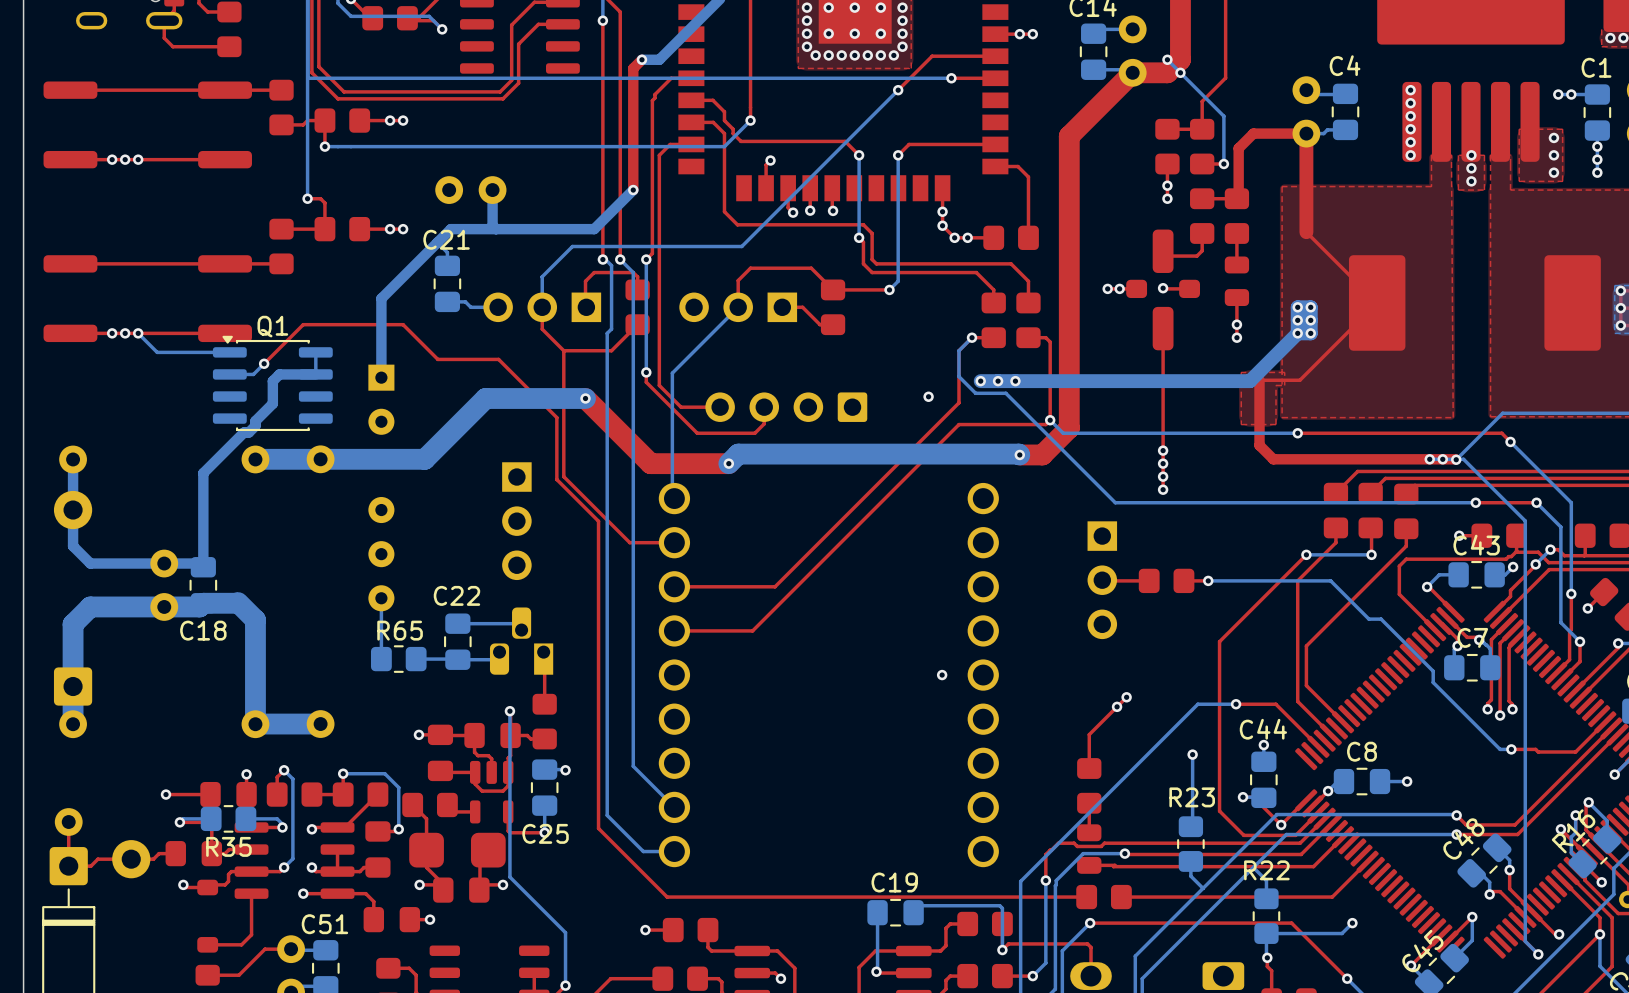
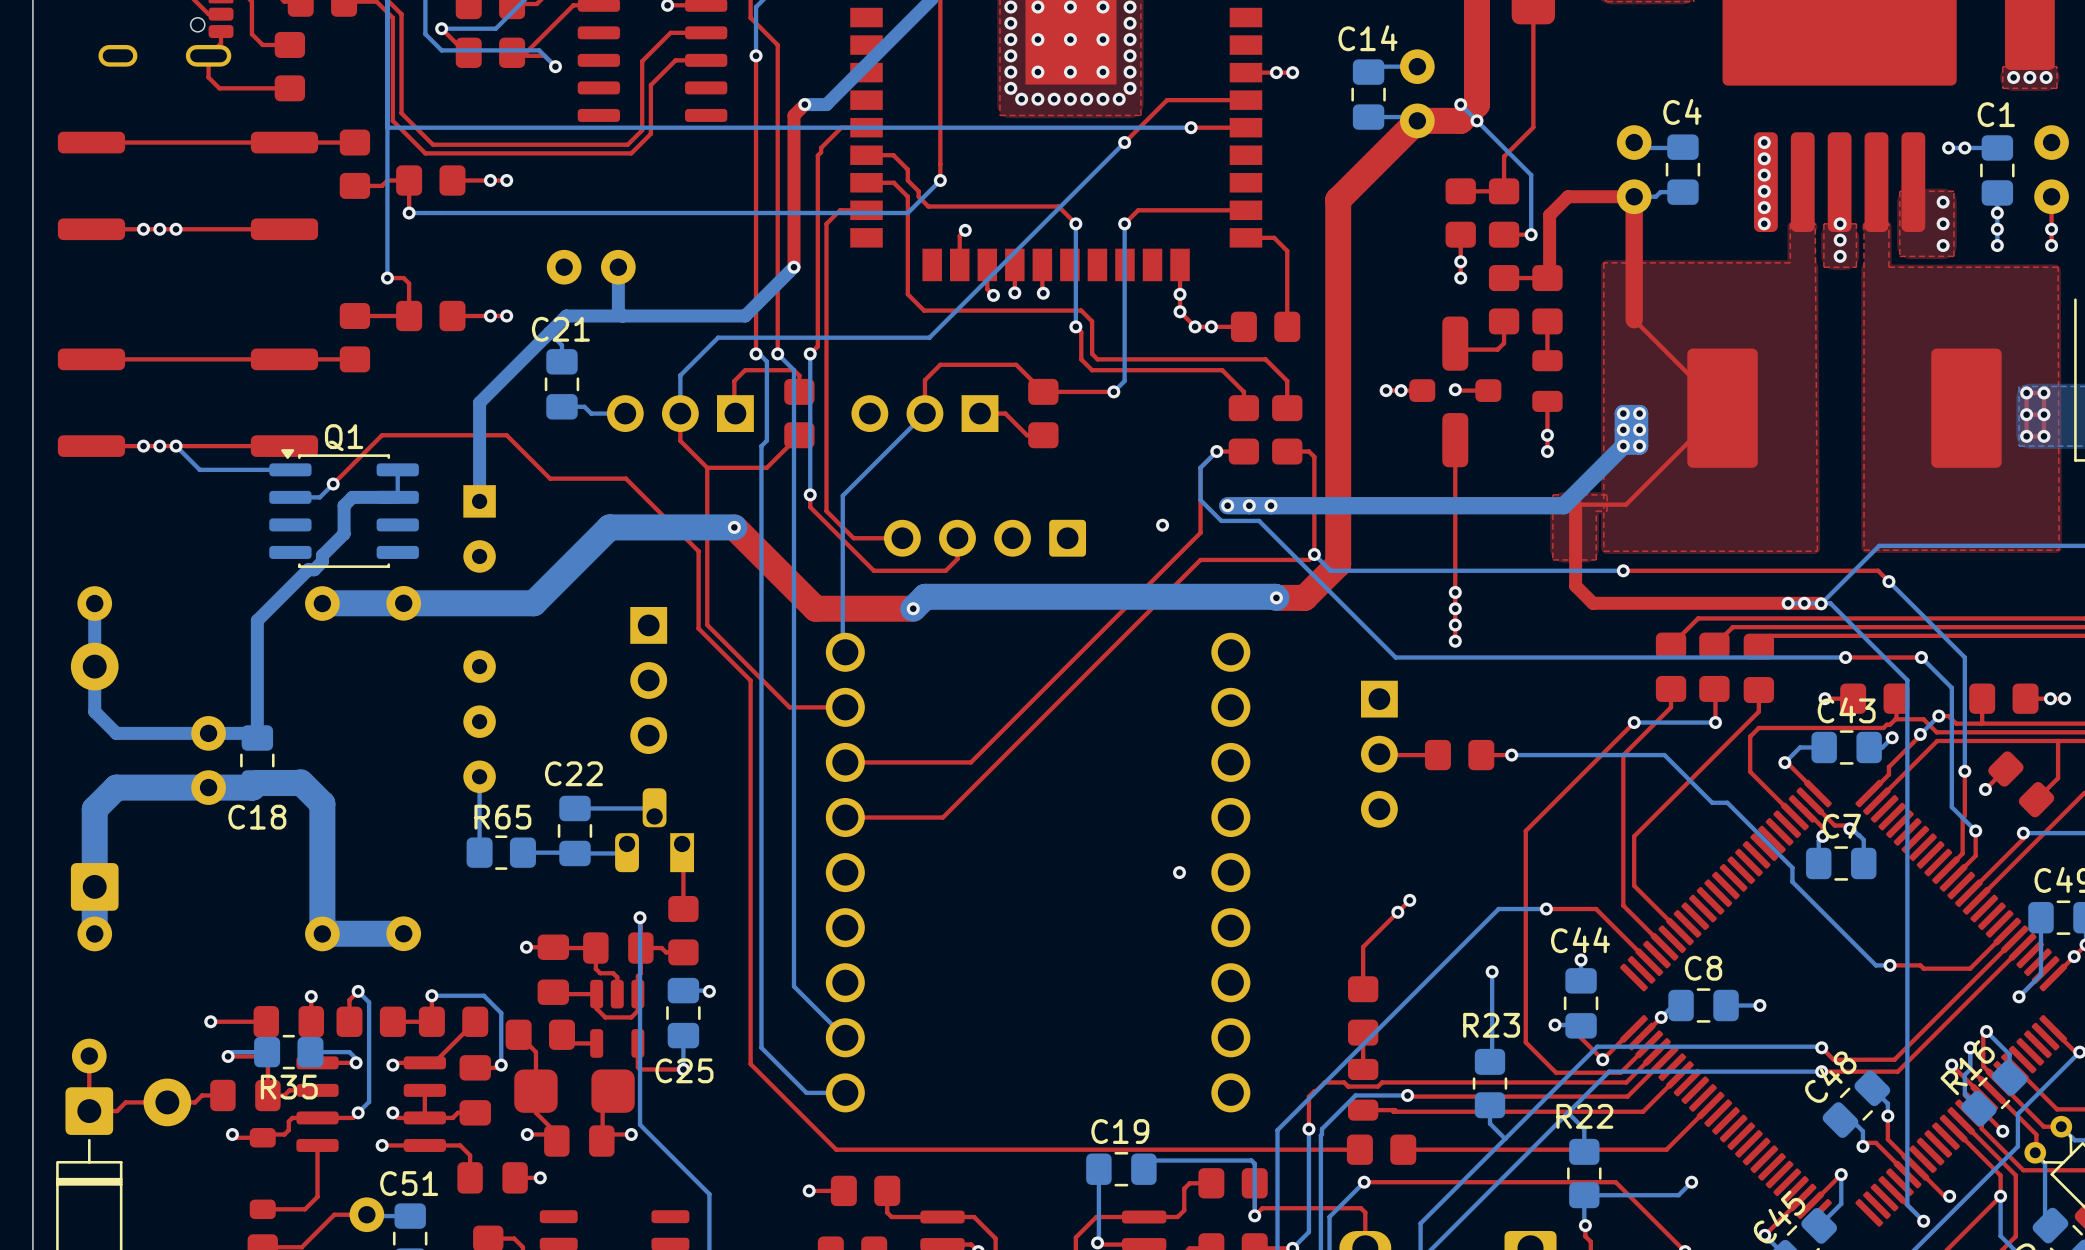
top track: (1507, 624) (1491, 639) (1491, 699) (1487, 703) (1487, 709) -> none
top track: (1513, 630) (1500, 643) (1500, 715) -> none
top track: (1519, 636) (1509, 647) (1509, 701) (1512, 704) (1512, 709) -> none
via: (1487, 709) -> none
via: (1512, 709) -> none
via: (1500, 715) -> none

